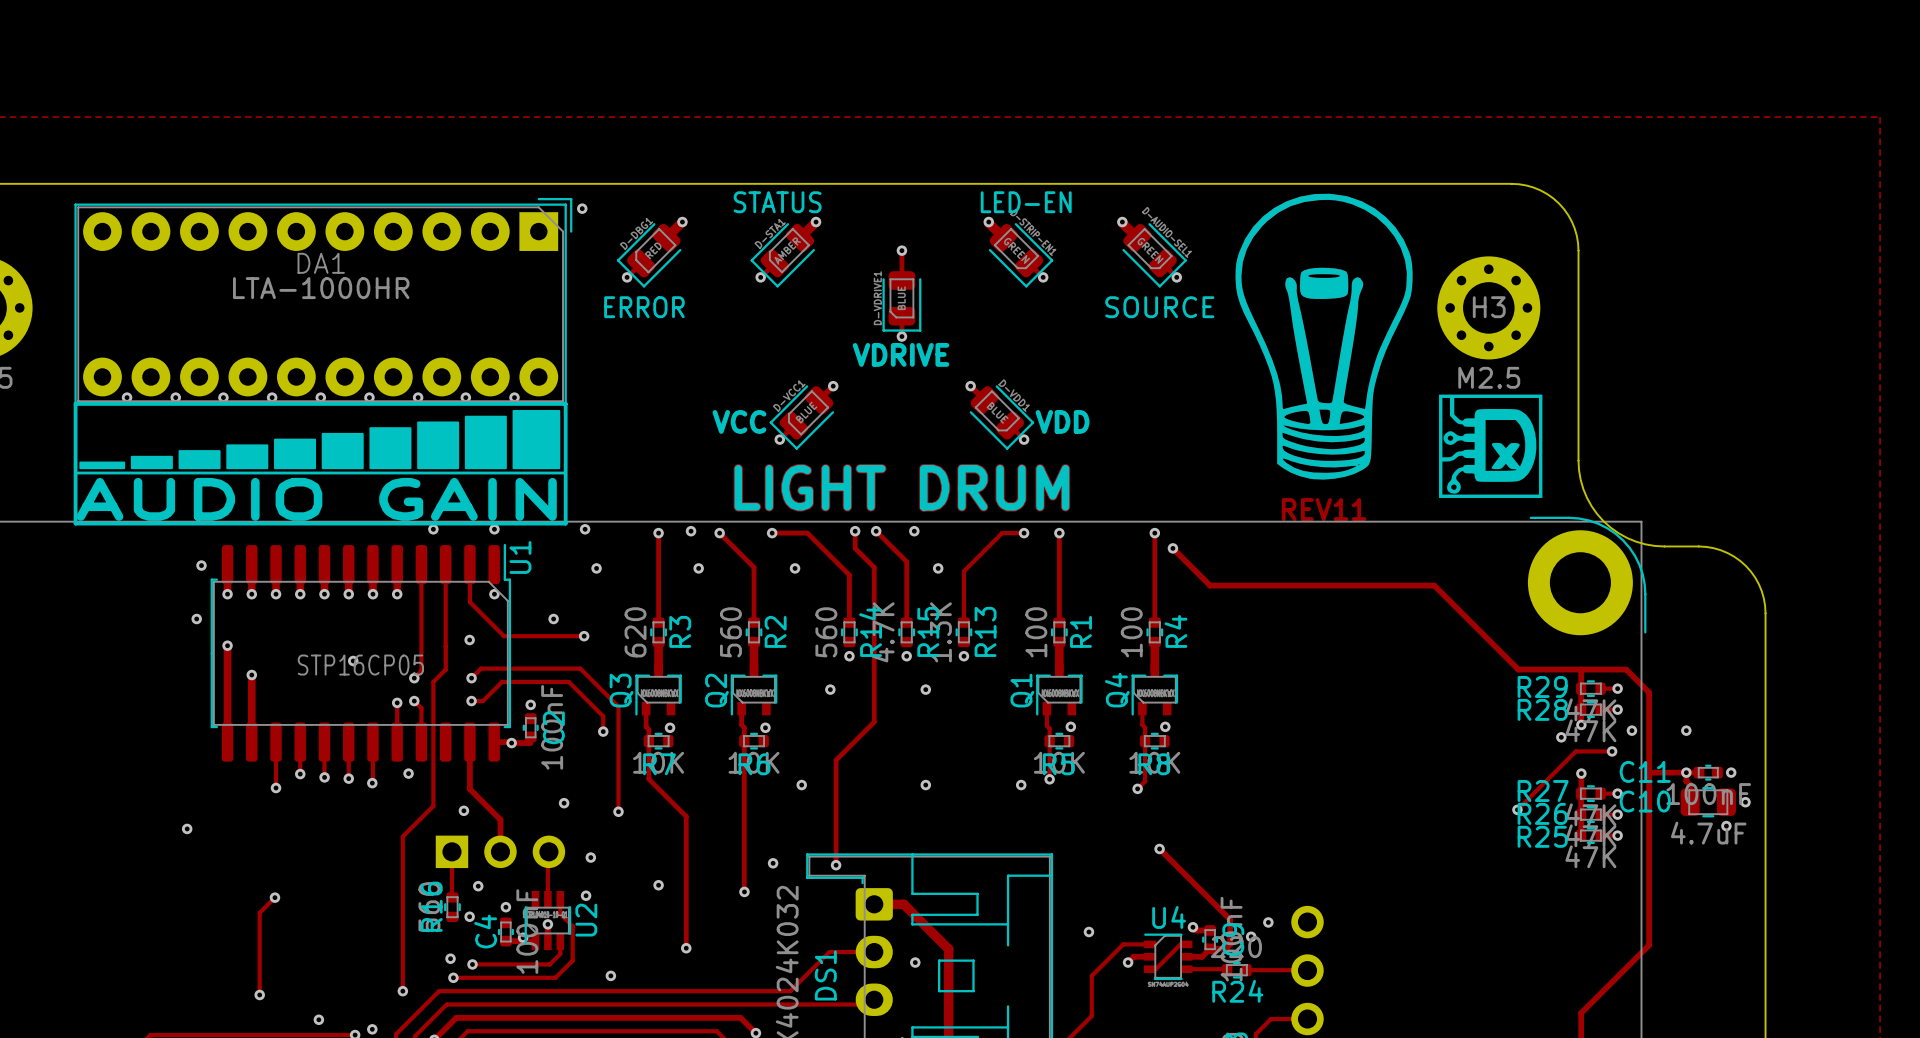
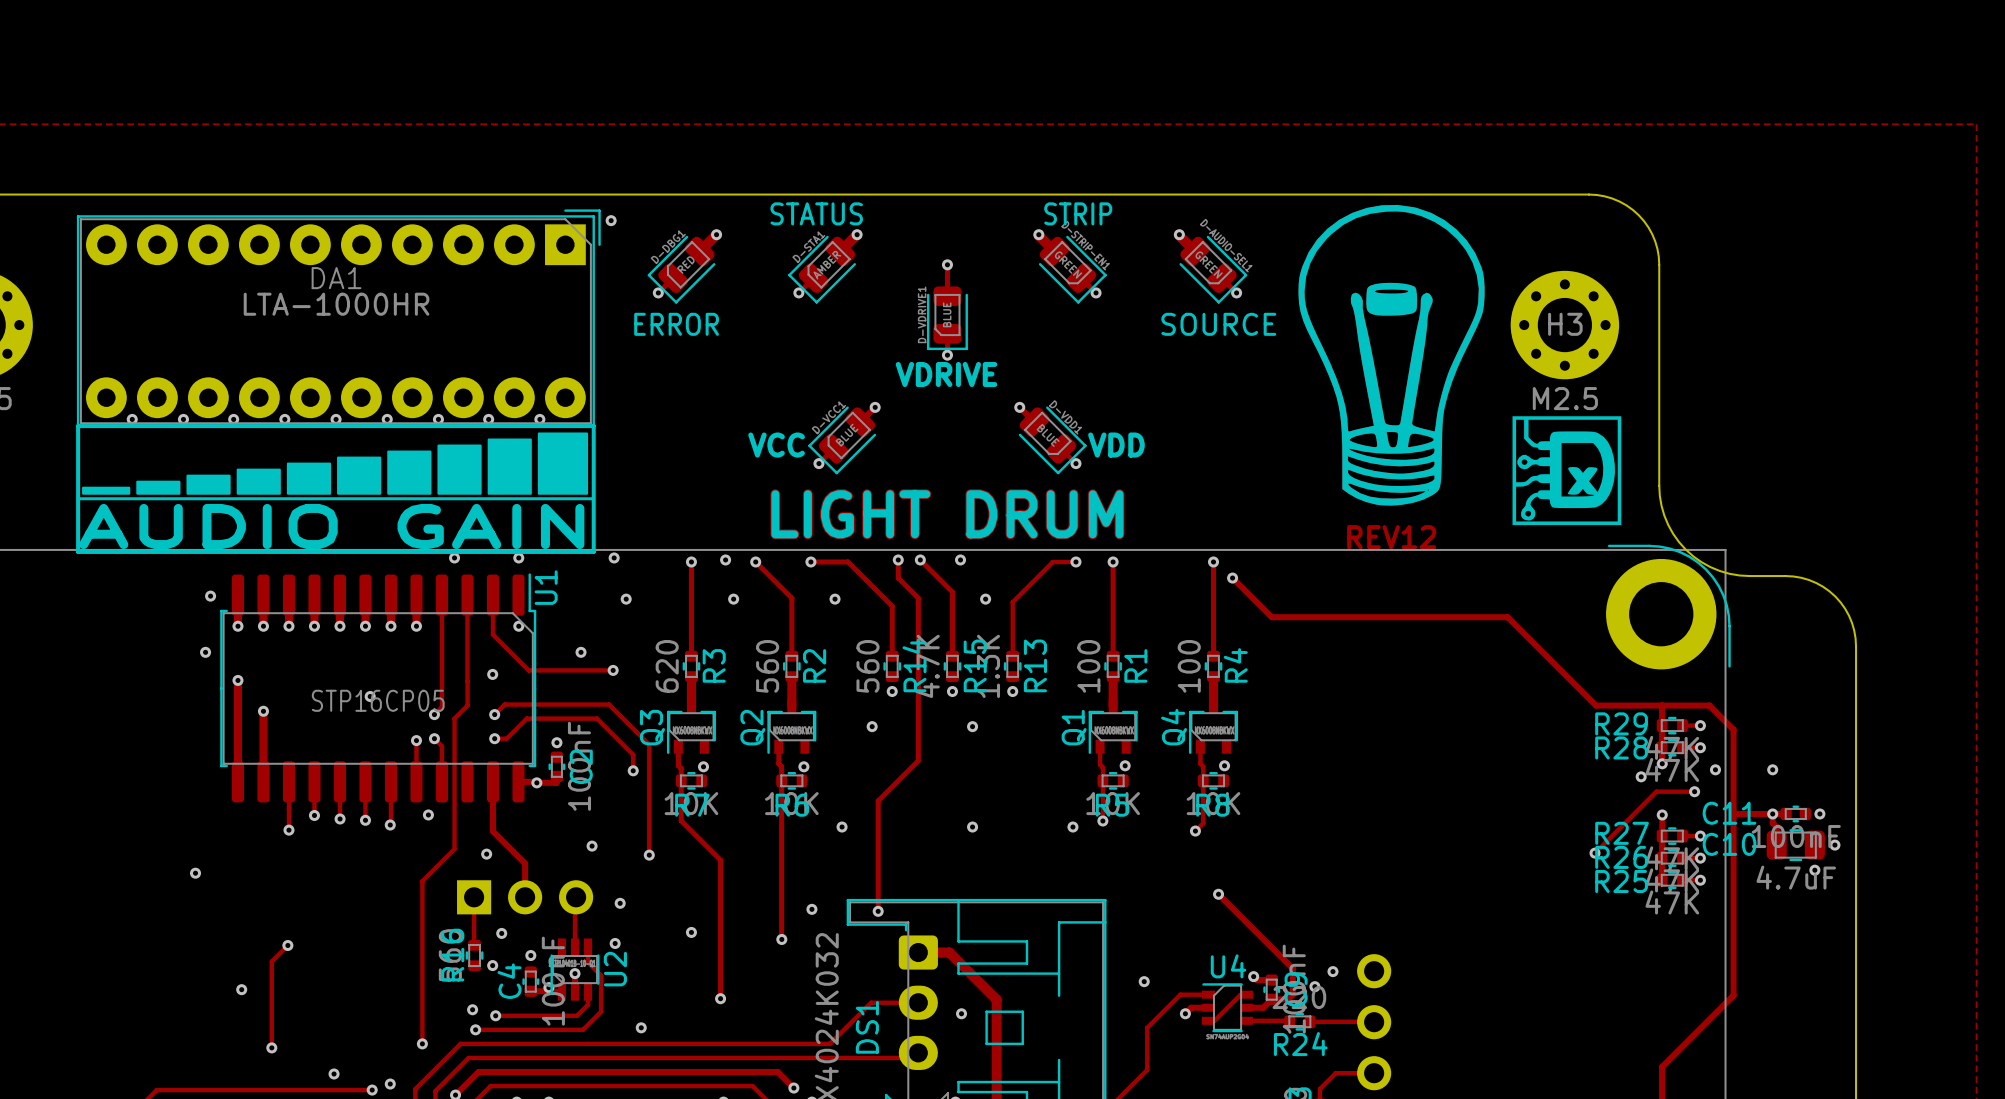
text: LED-EN (1026, 202) -> STRIP (1078, 213)
text: REV11 (1324, 509) -> REV12 (1391, 537)
via: none -> (241, 989)

